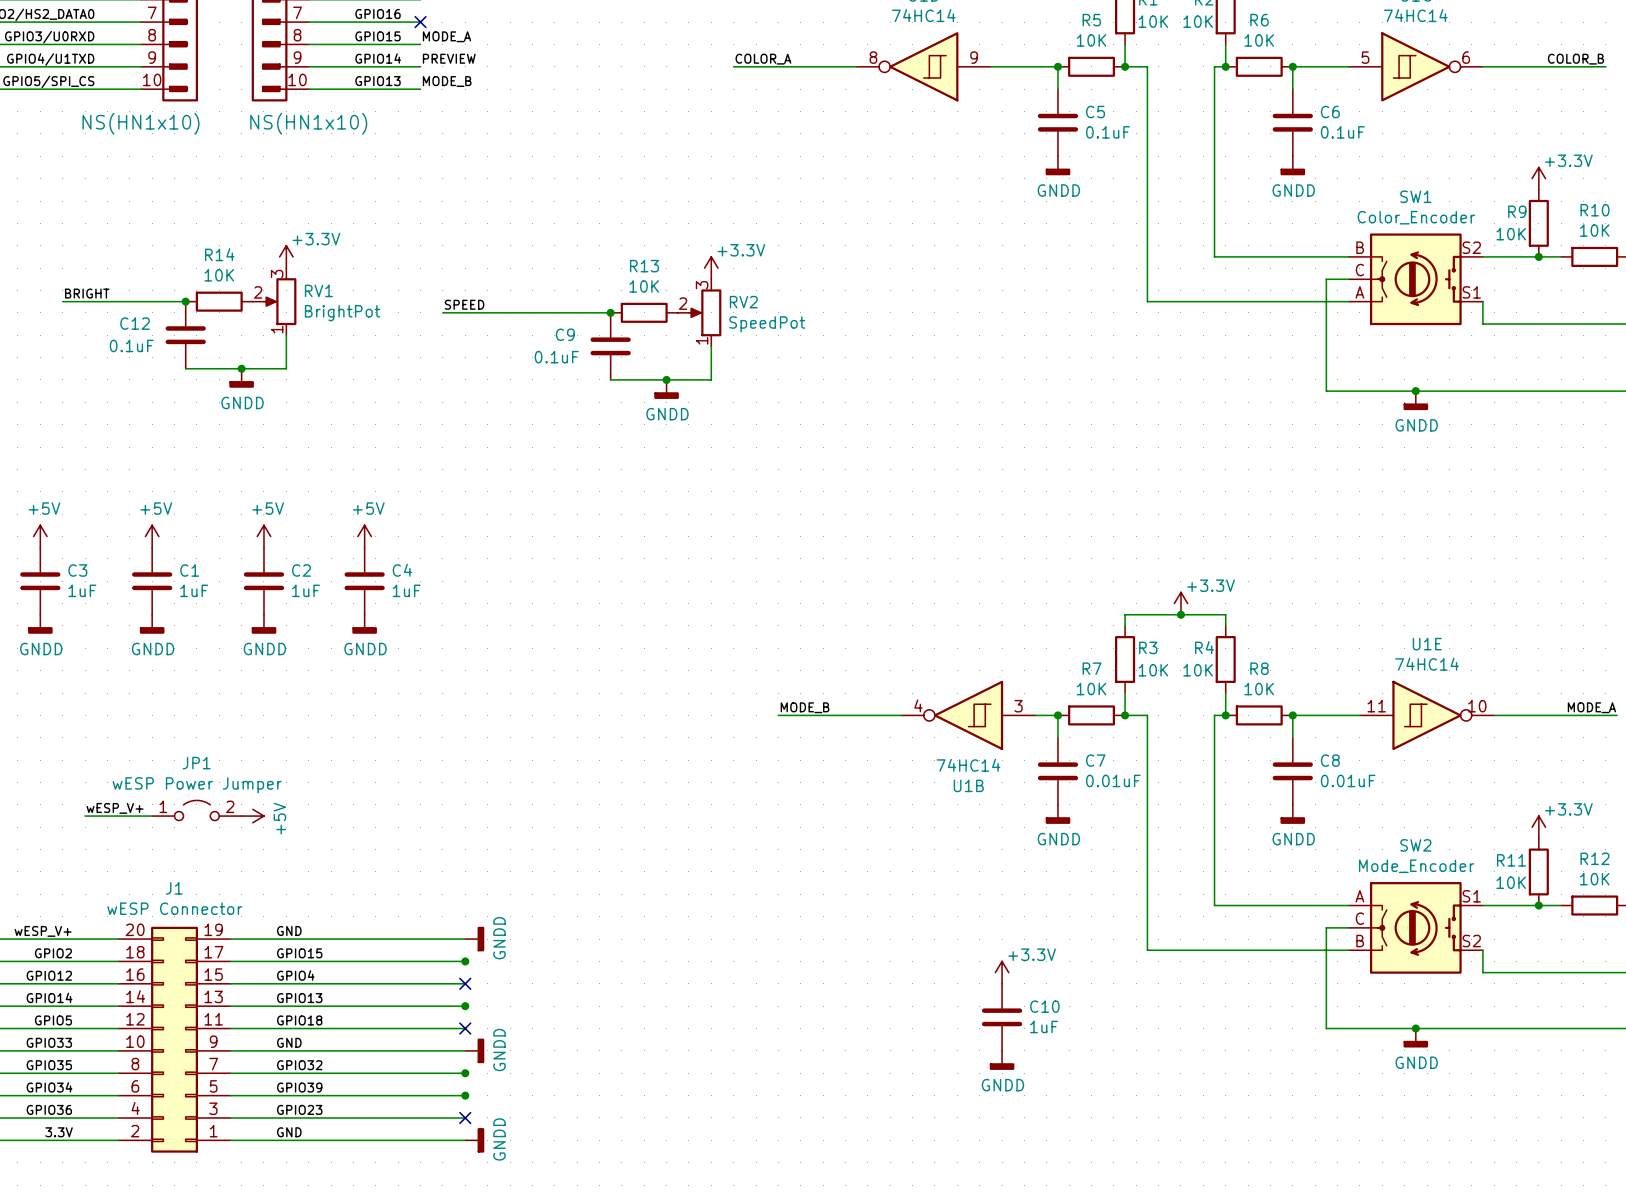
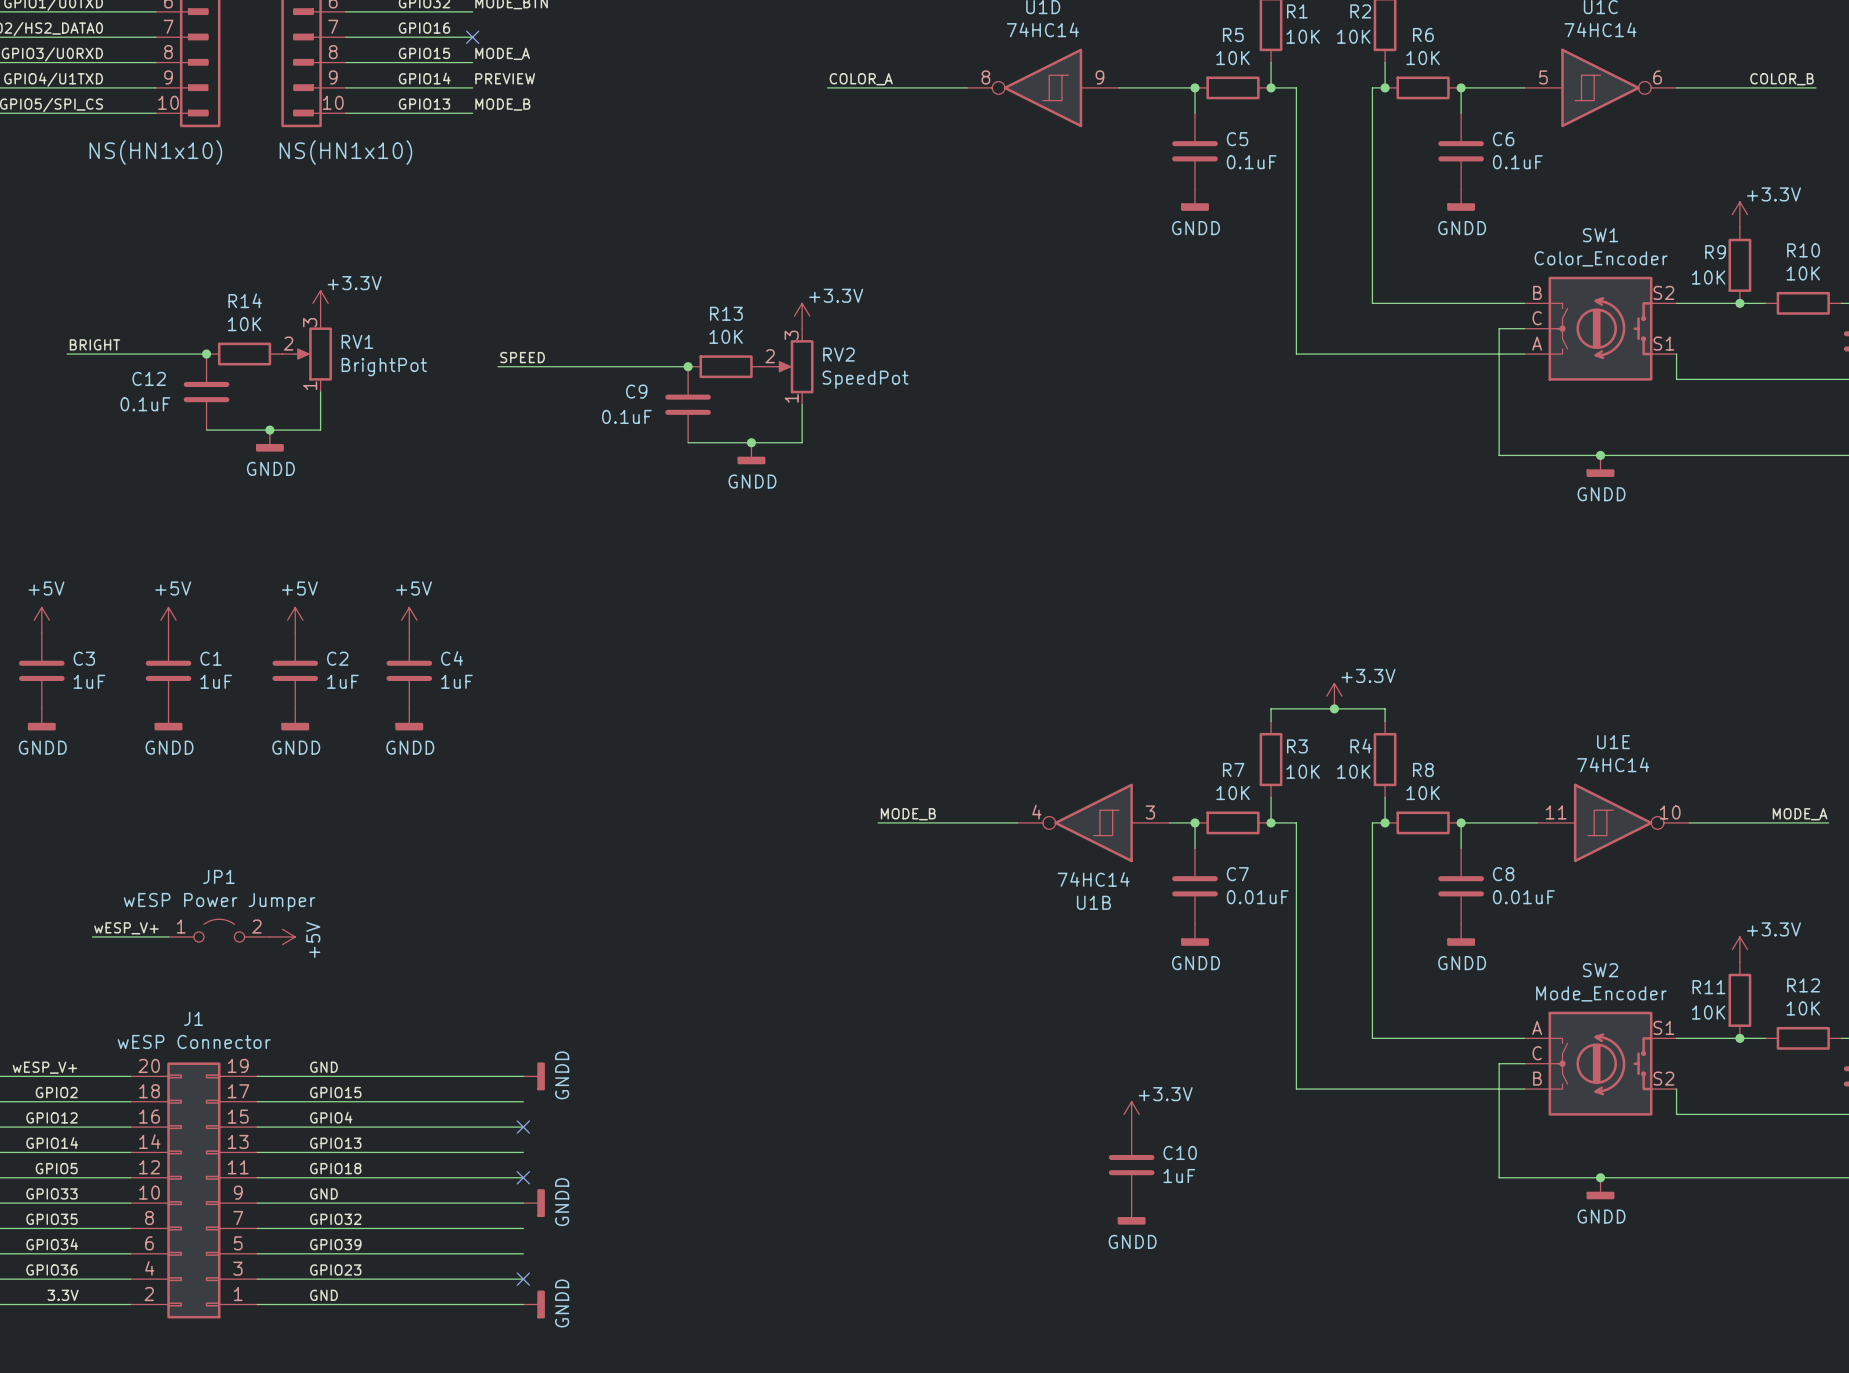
junction: (465, 961) -> none
junction: (465, 1006) -> none
junction: (465, 1073) -> none
junction: (465, 1095) -> none

